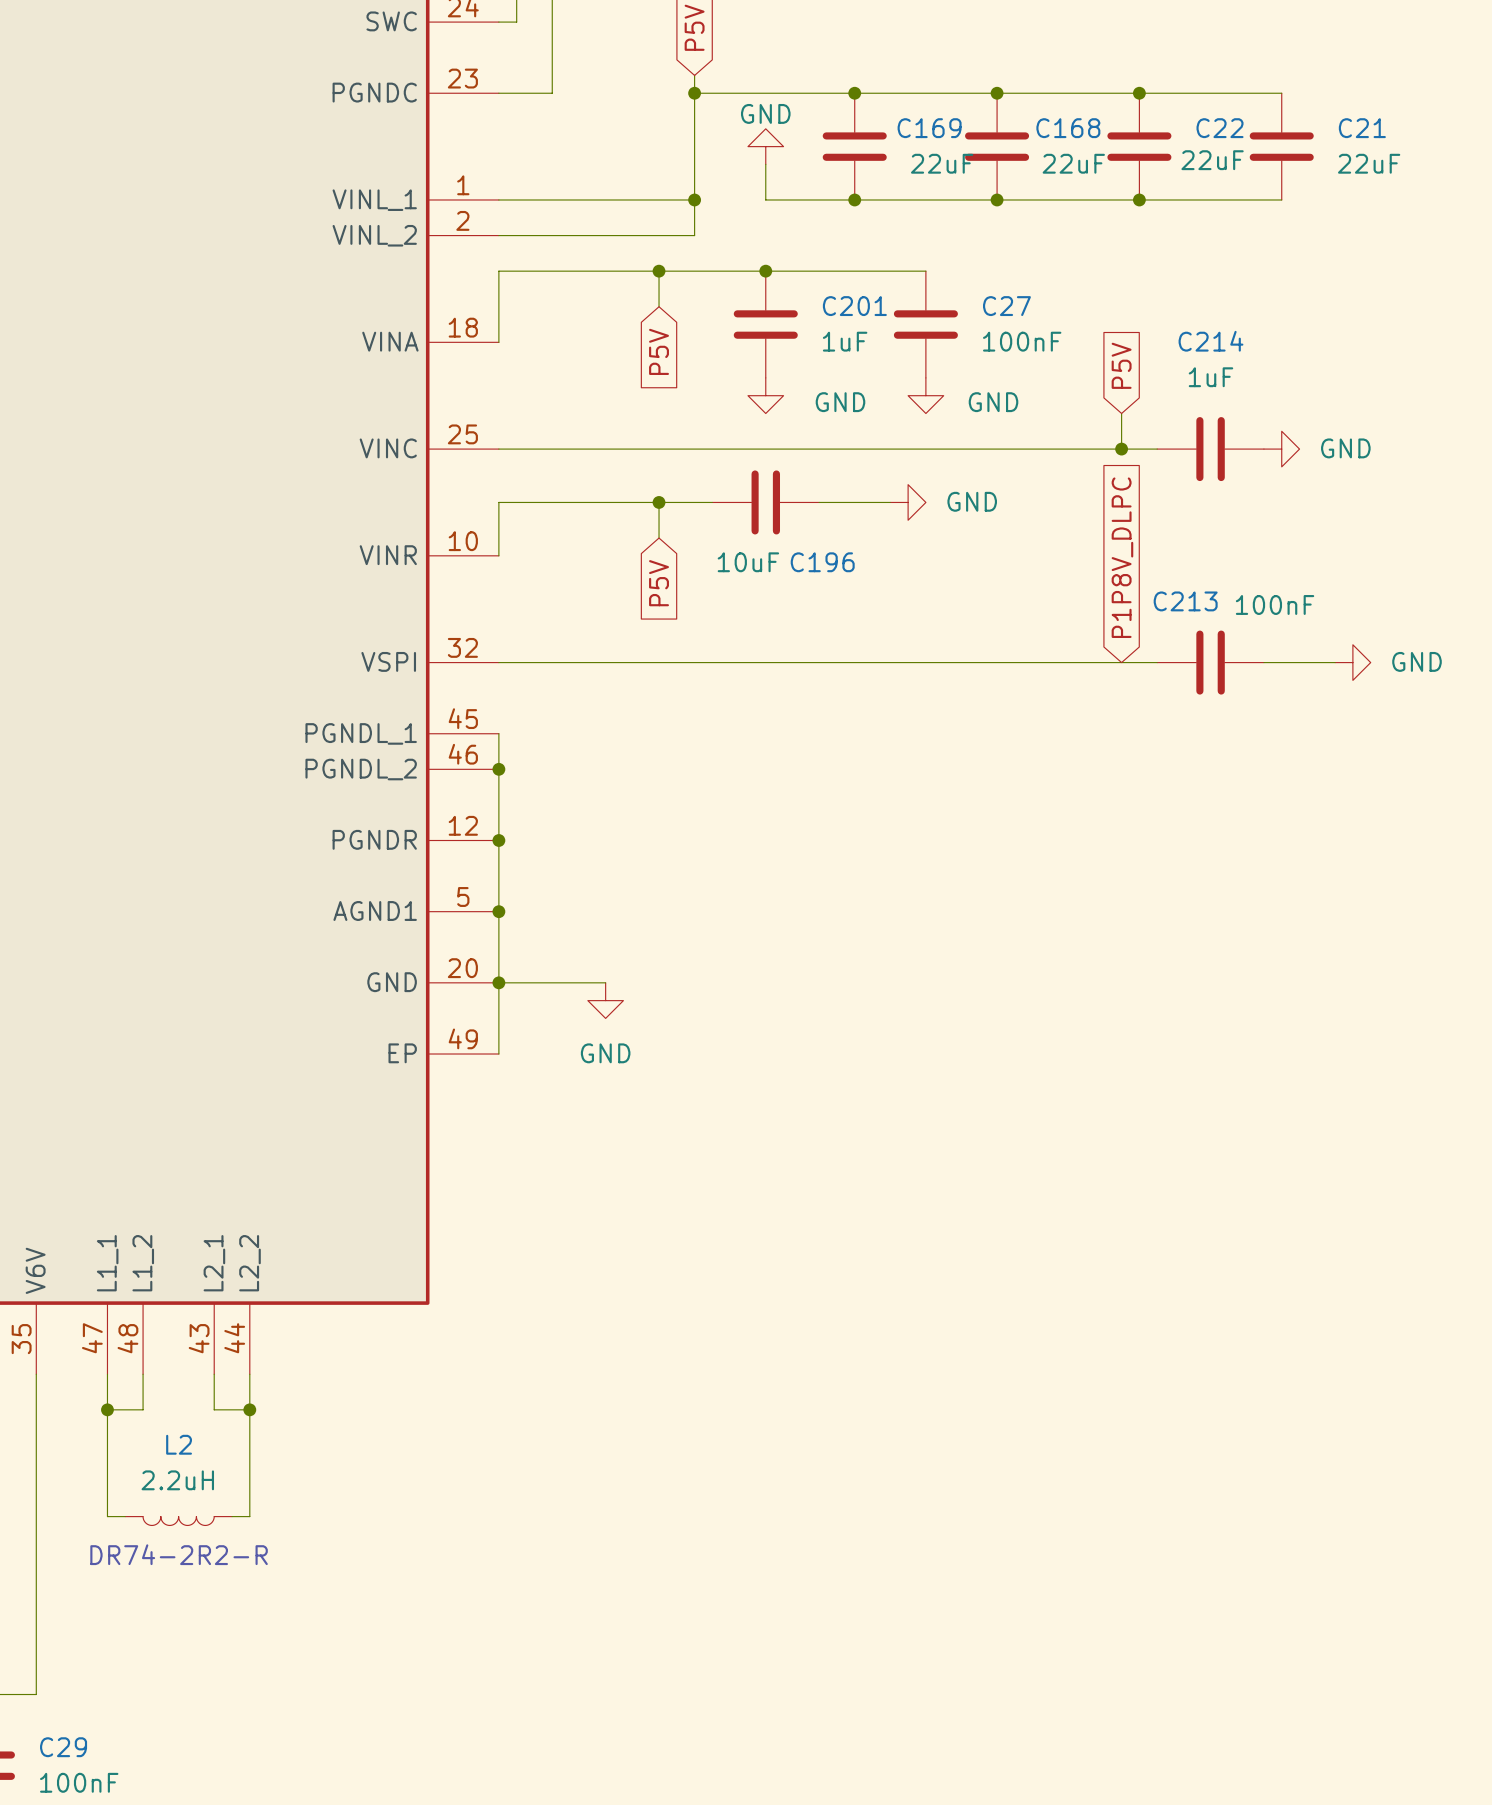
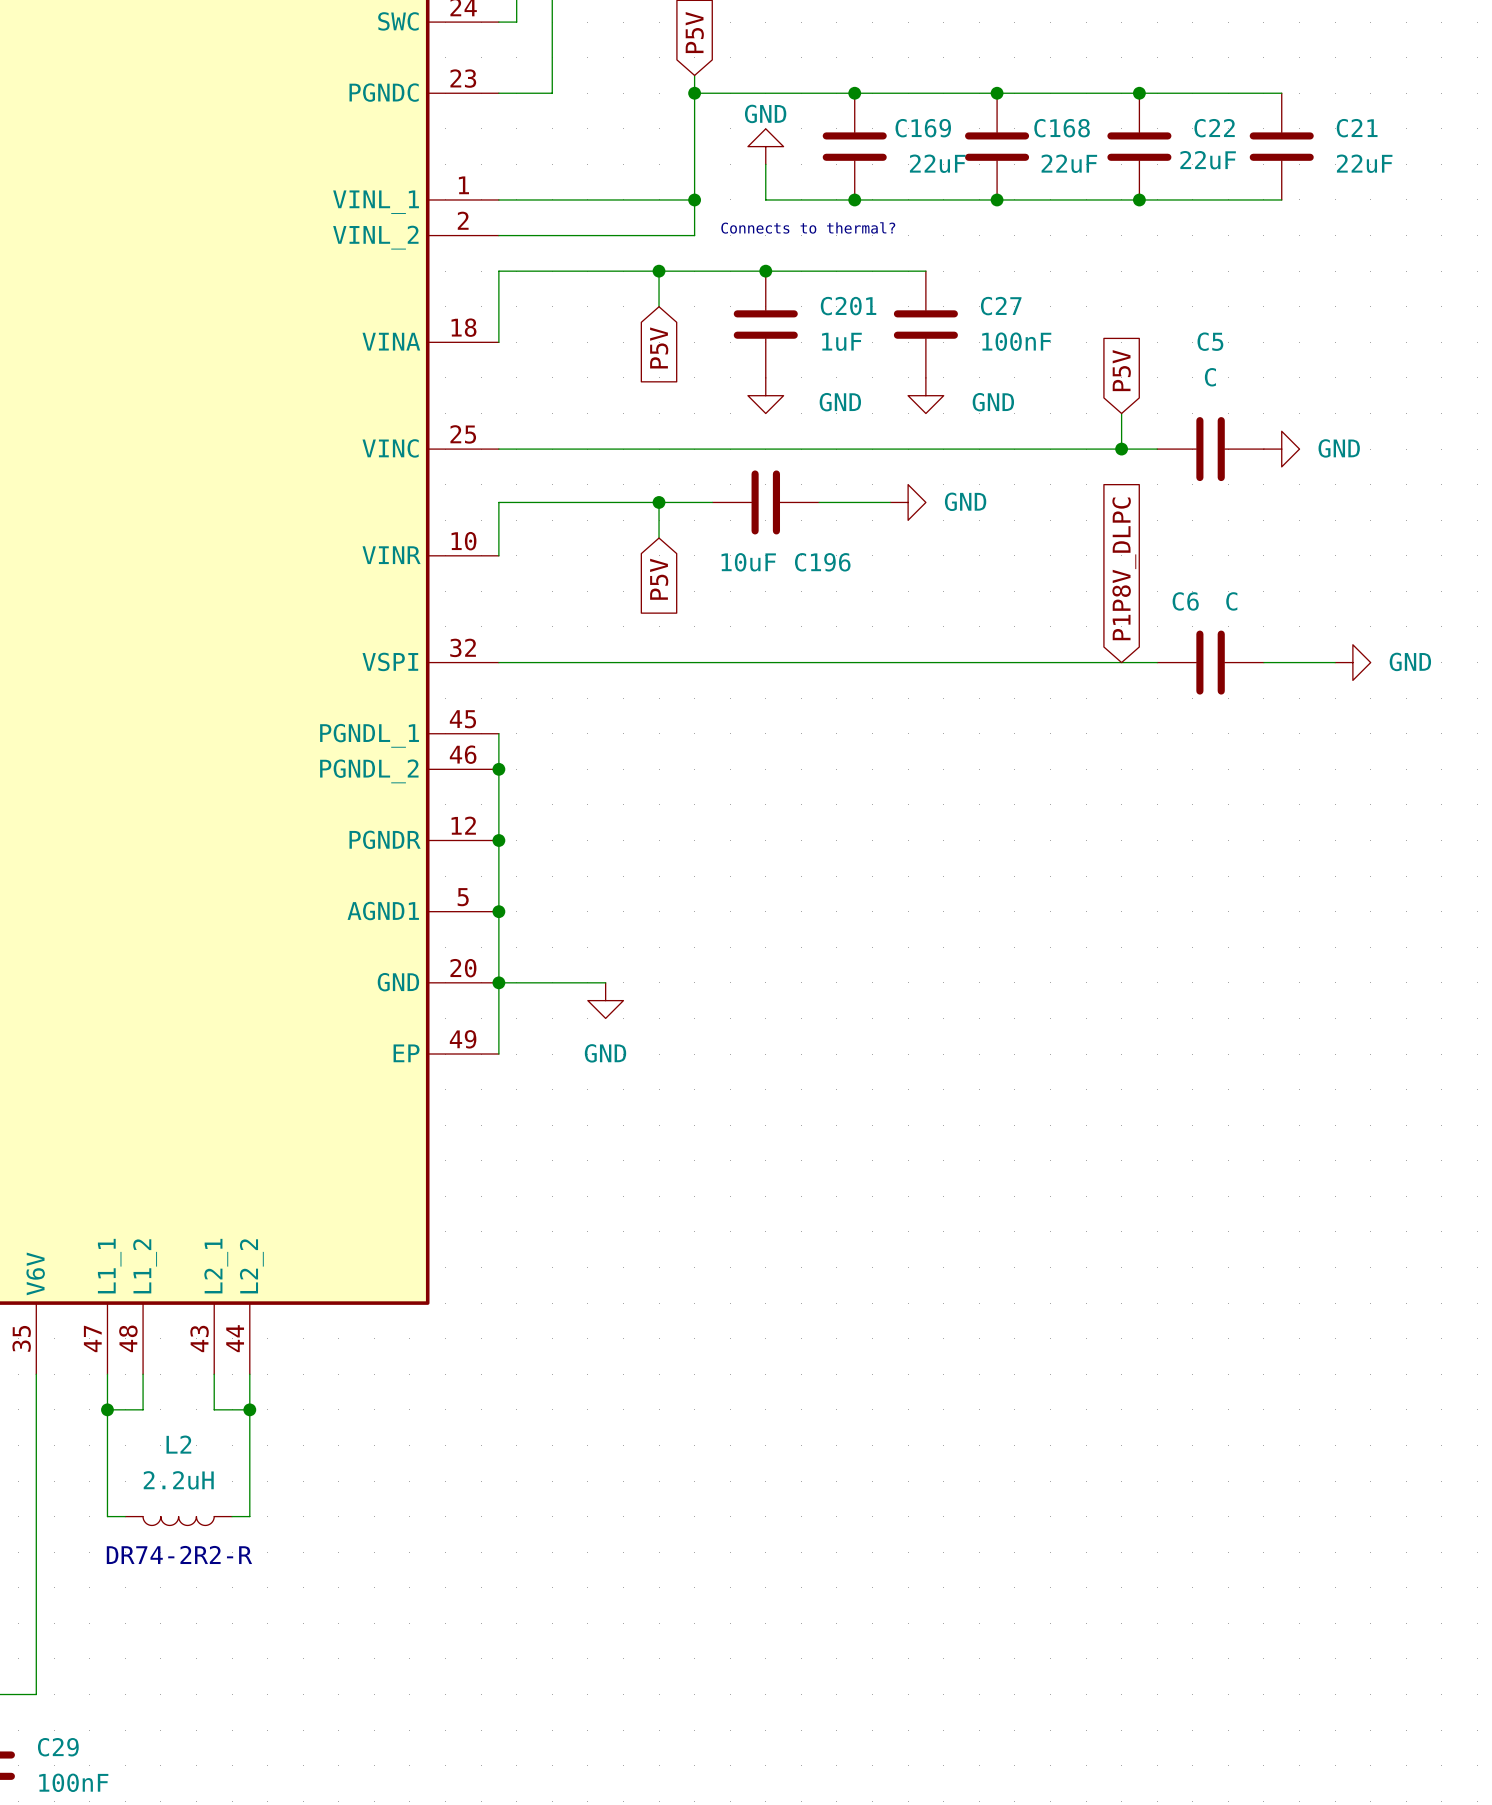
text: none -> Connects to thermal? (808, 227)
C214 name: C214 (1210, 341) -> C5 (1210, 341)
C214 value: 1uF (1210, 377) -> C (1210, 377)
C213 name: C213 (1185, 601) -> C6 (1185, 601)
C213 value: 100nF (1275, 604) -> C (1231, 601)

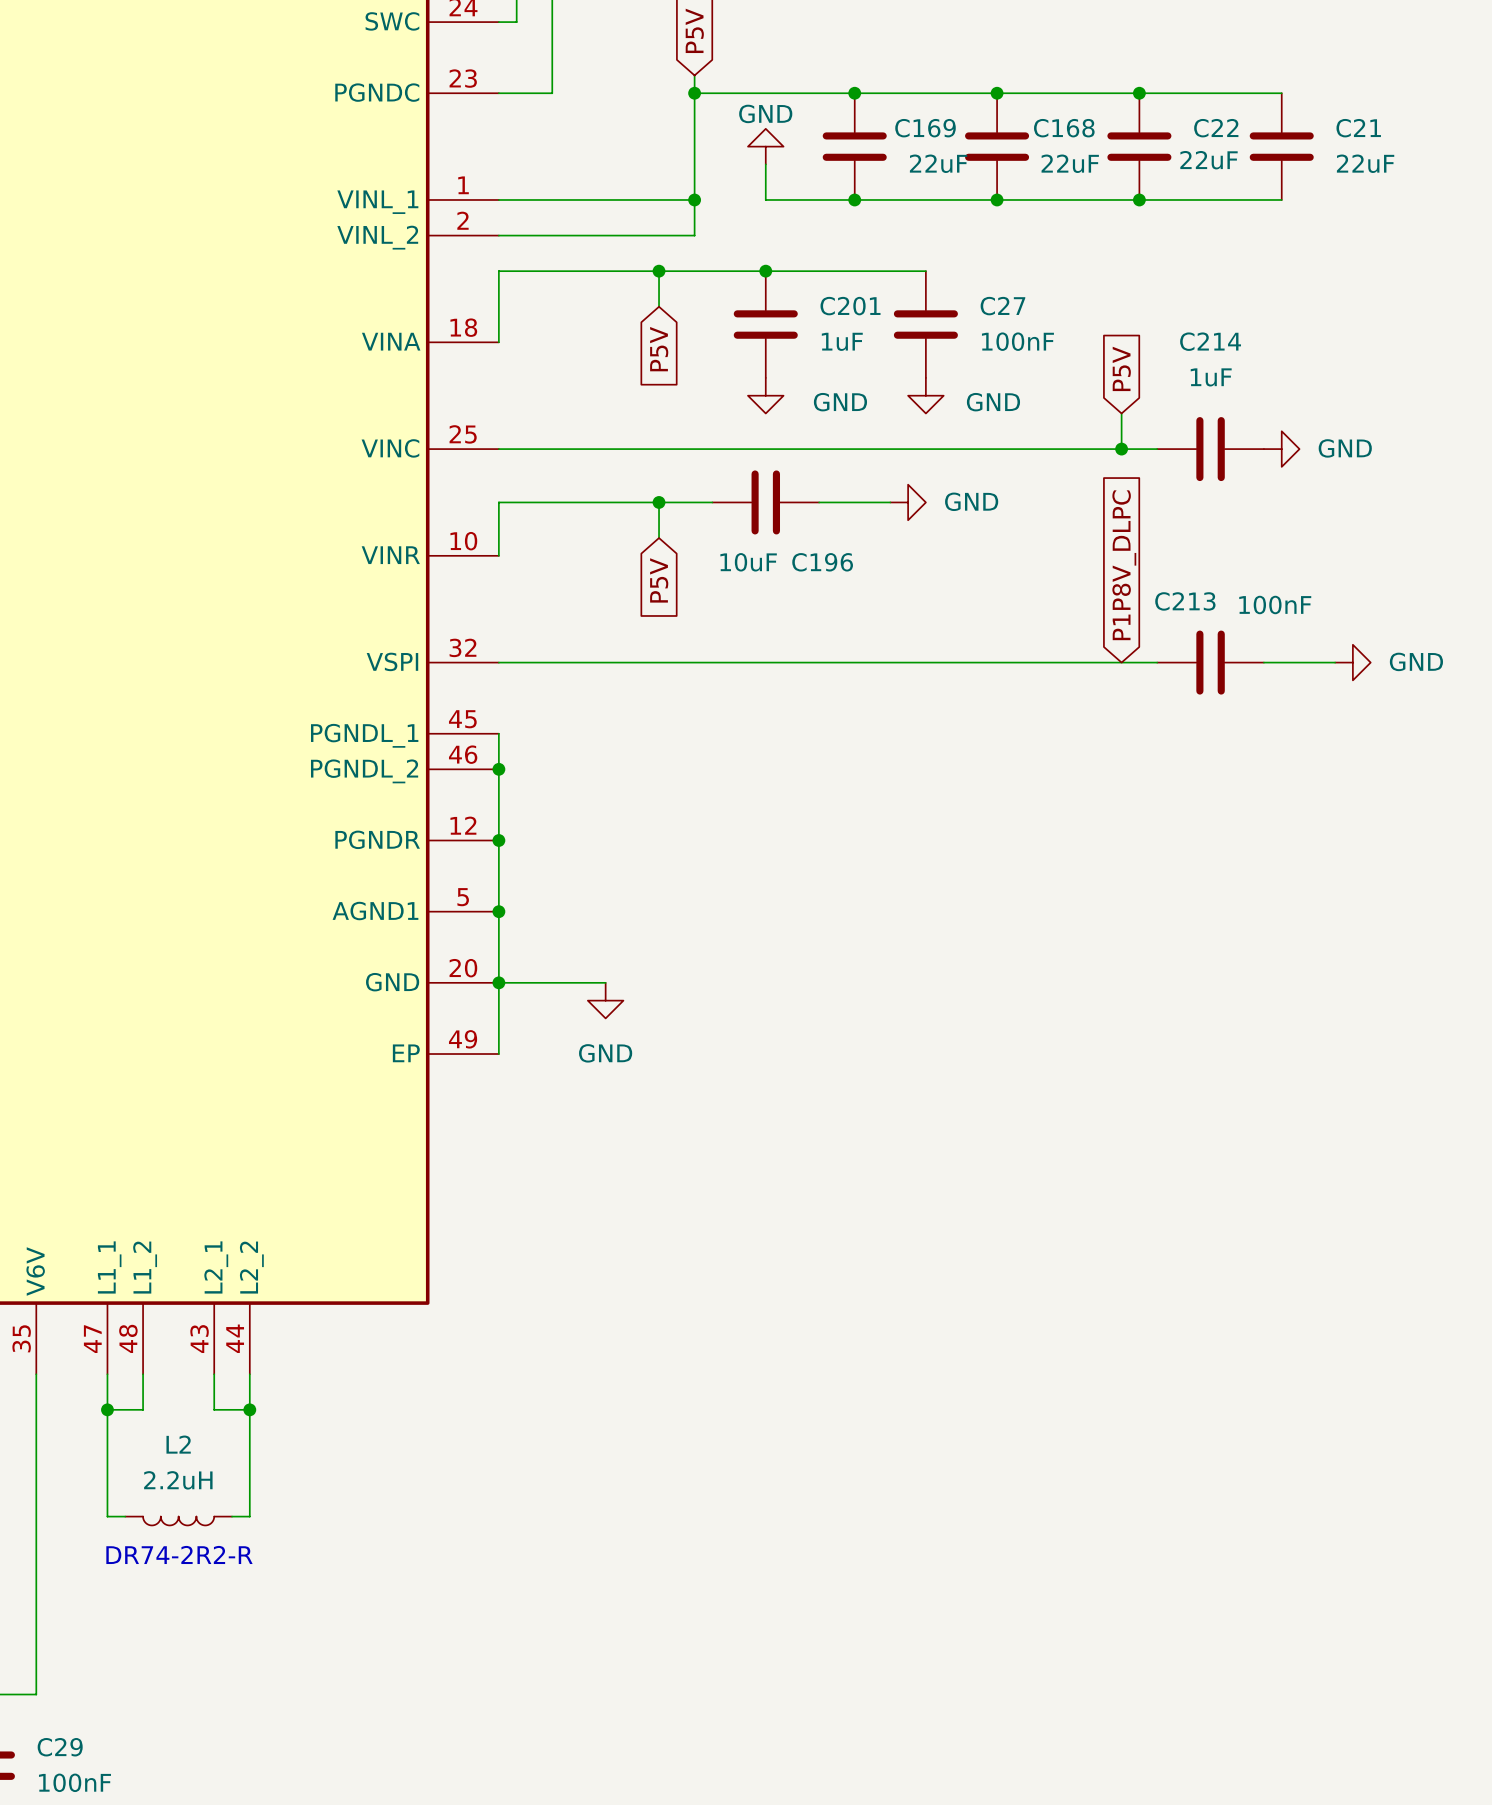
text: Connects to thermal? (808, 227) -> none
C5 name: C5 (1210, 341) -> C214 (1210, 341)
C5 value: C (1210, 377) -> 1uF (1211, 377)
C6 name: C6 (1185, 601) -> C213 (1185, 601)
C6 value: C (1231, 601) -> 100nF (1275, 604)

